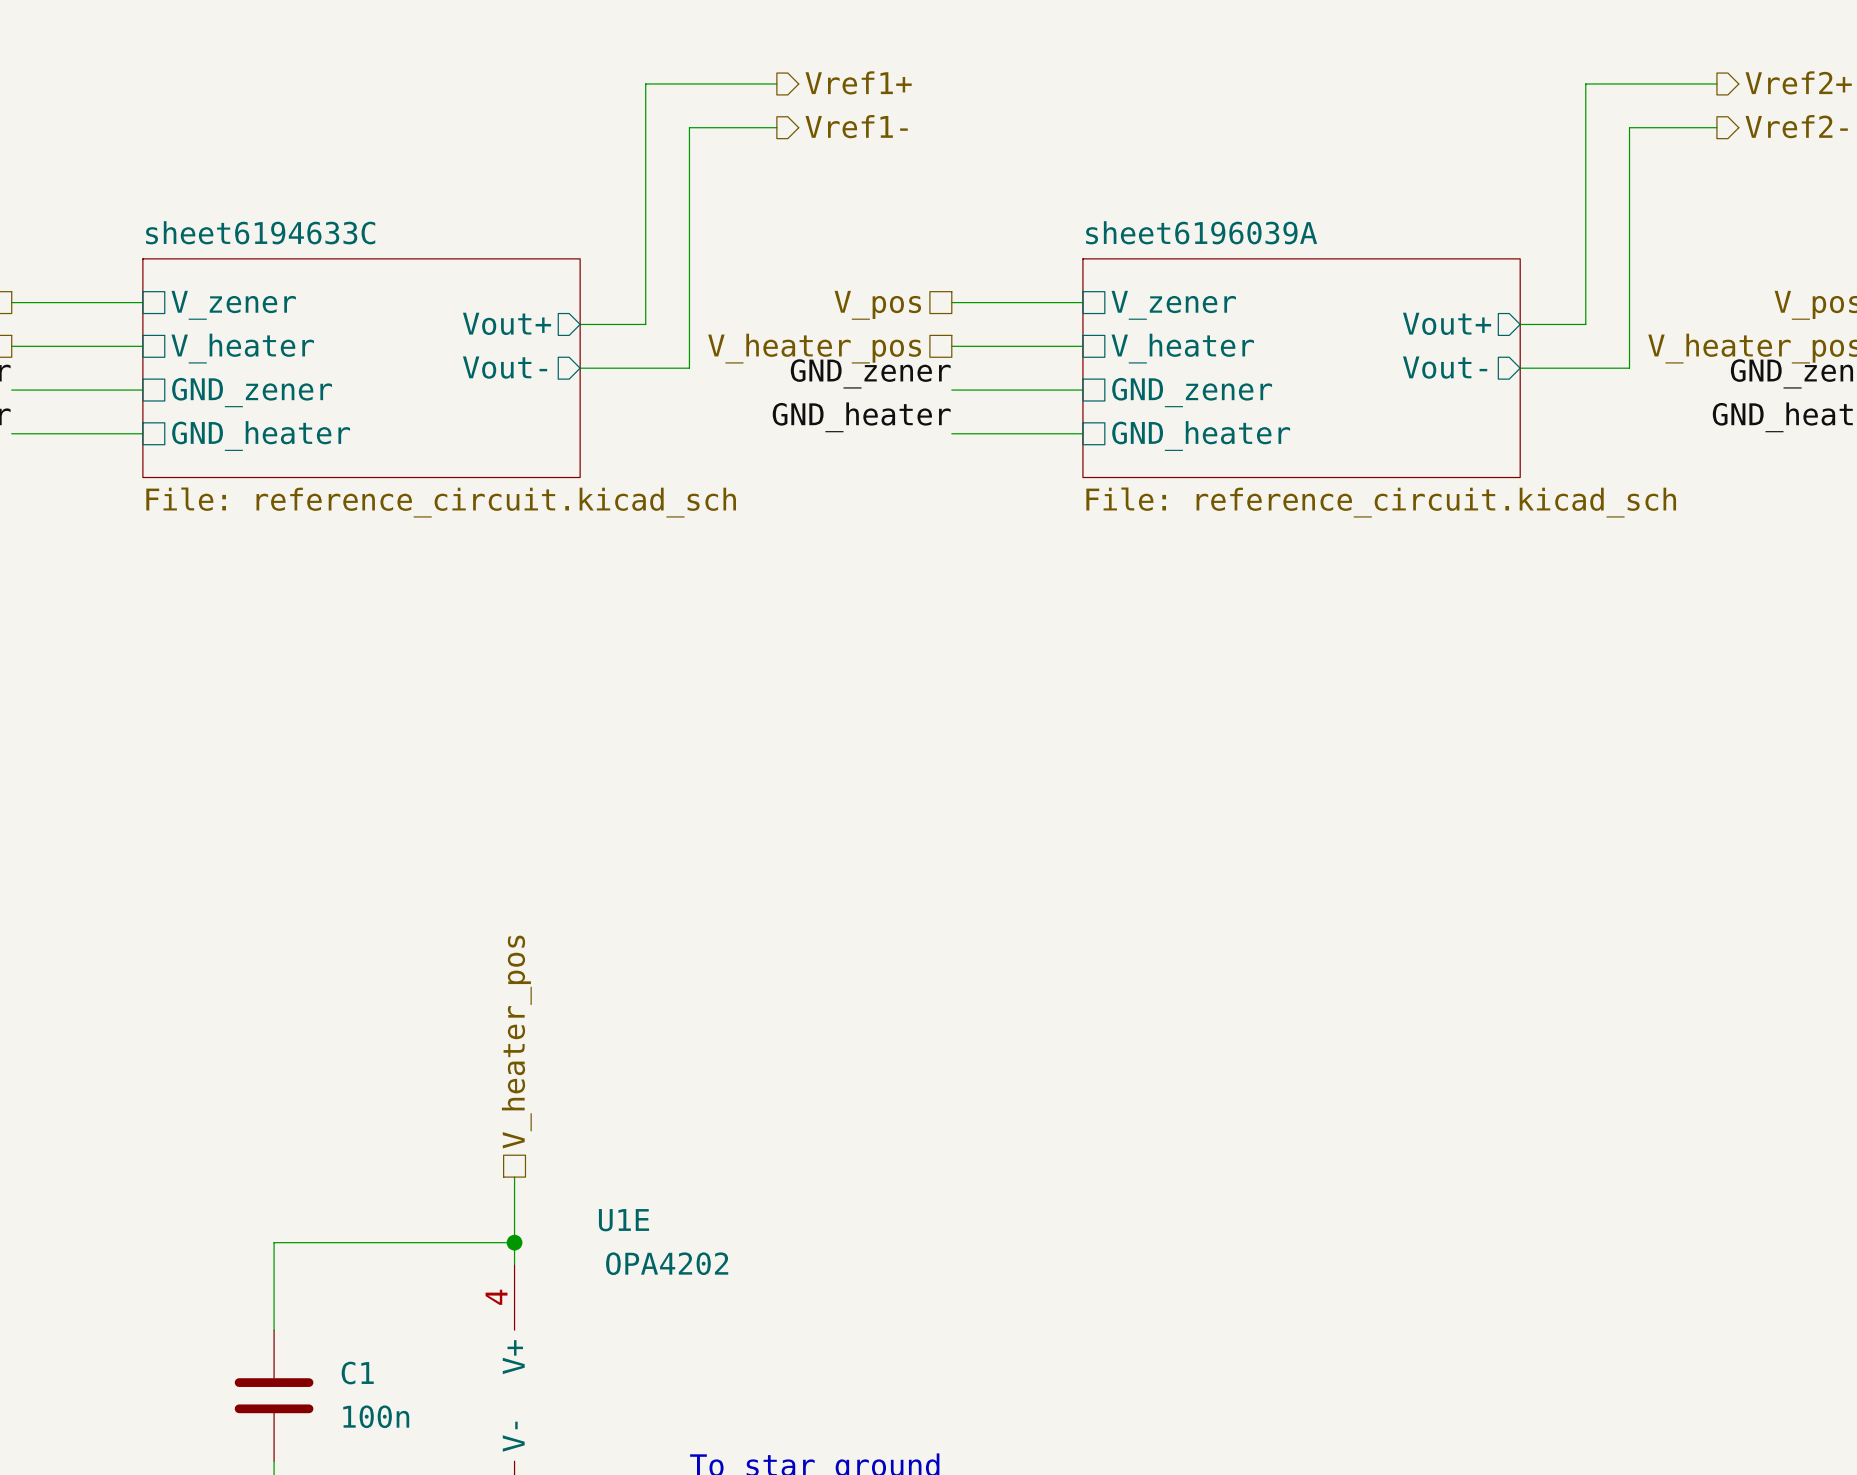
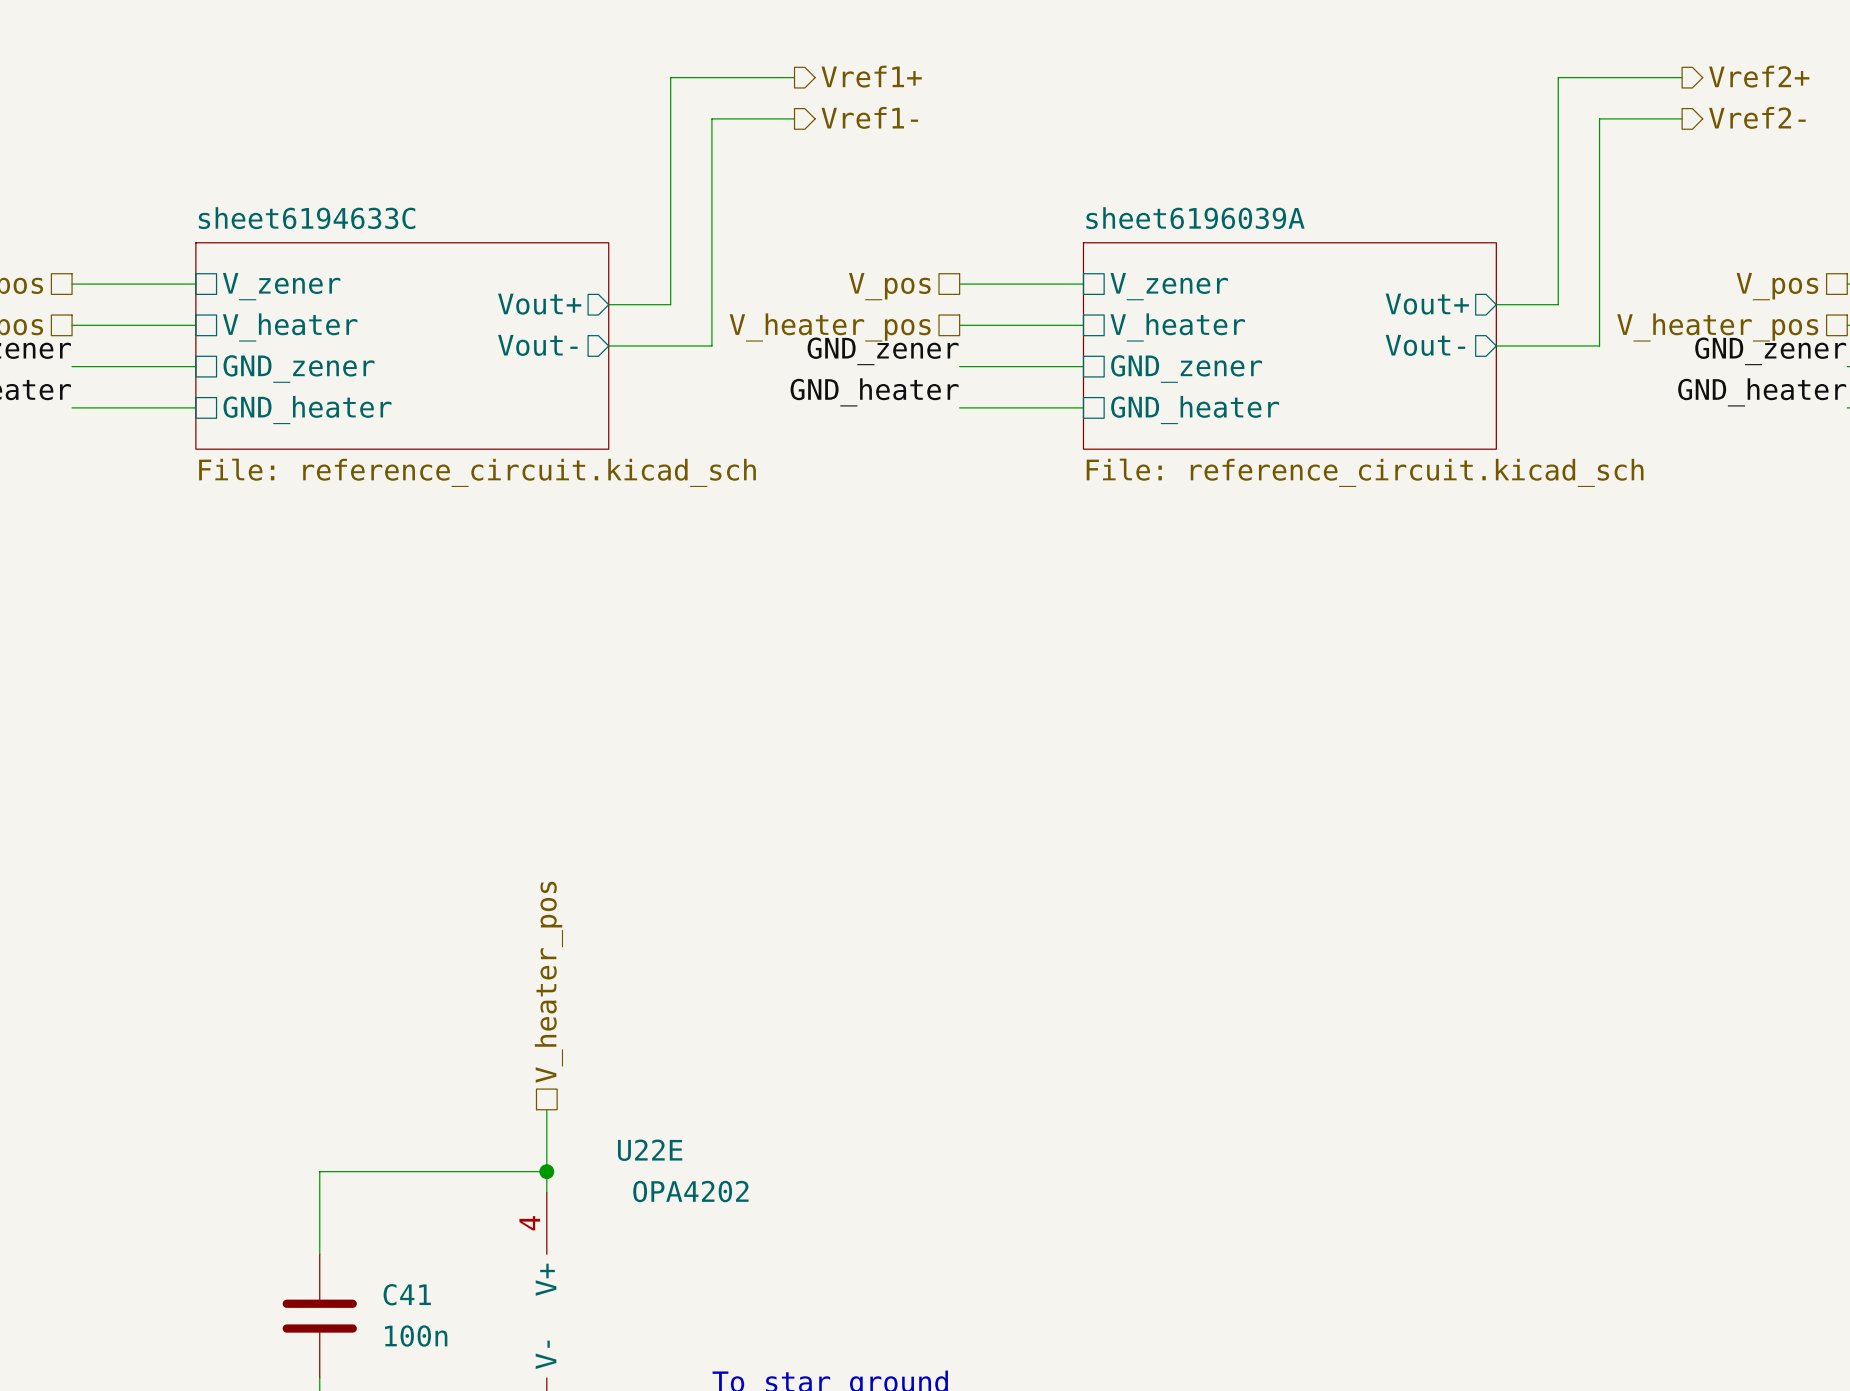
U1E name: U1E (623, 1220) -> U22E (650, 1150)
C1 name: C1 (357, 1373) -> C41 (407, 1294)

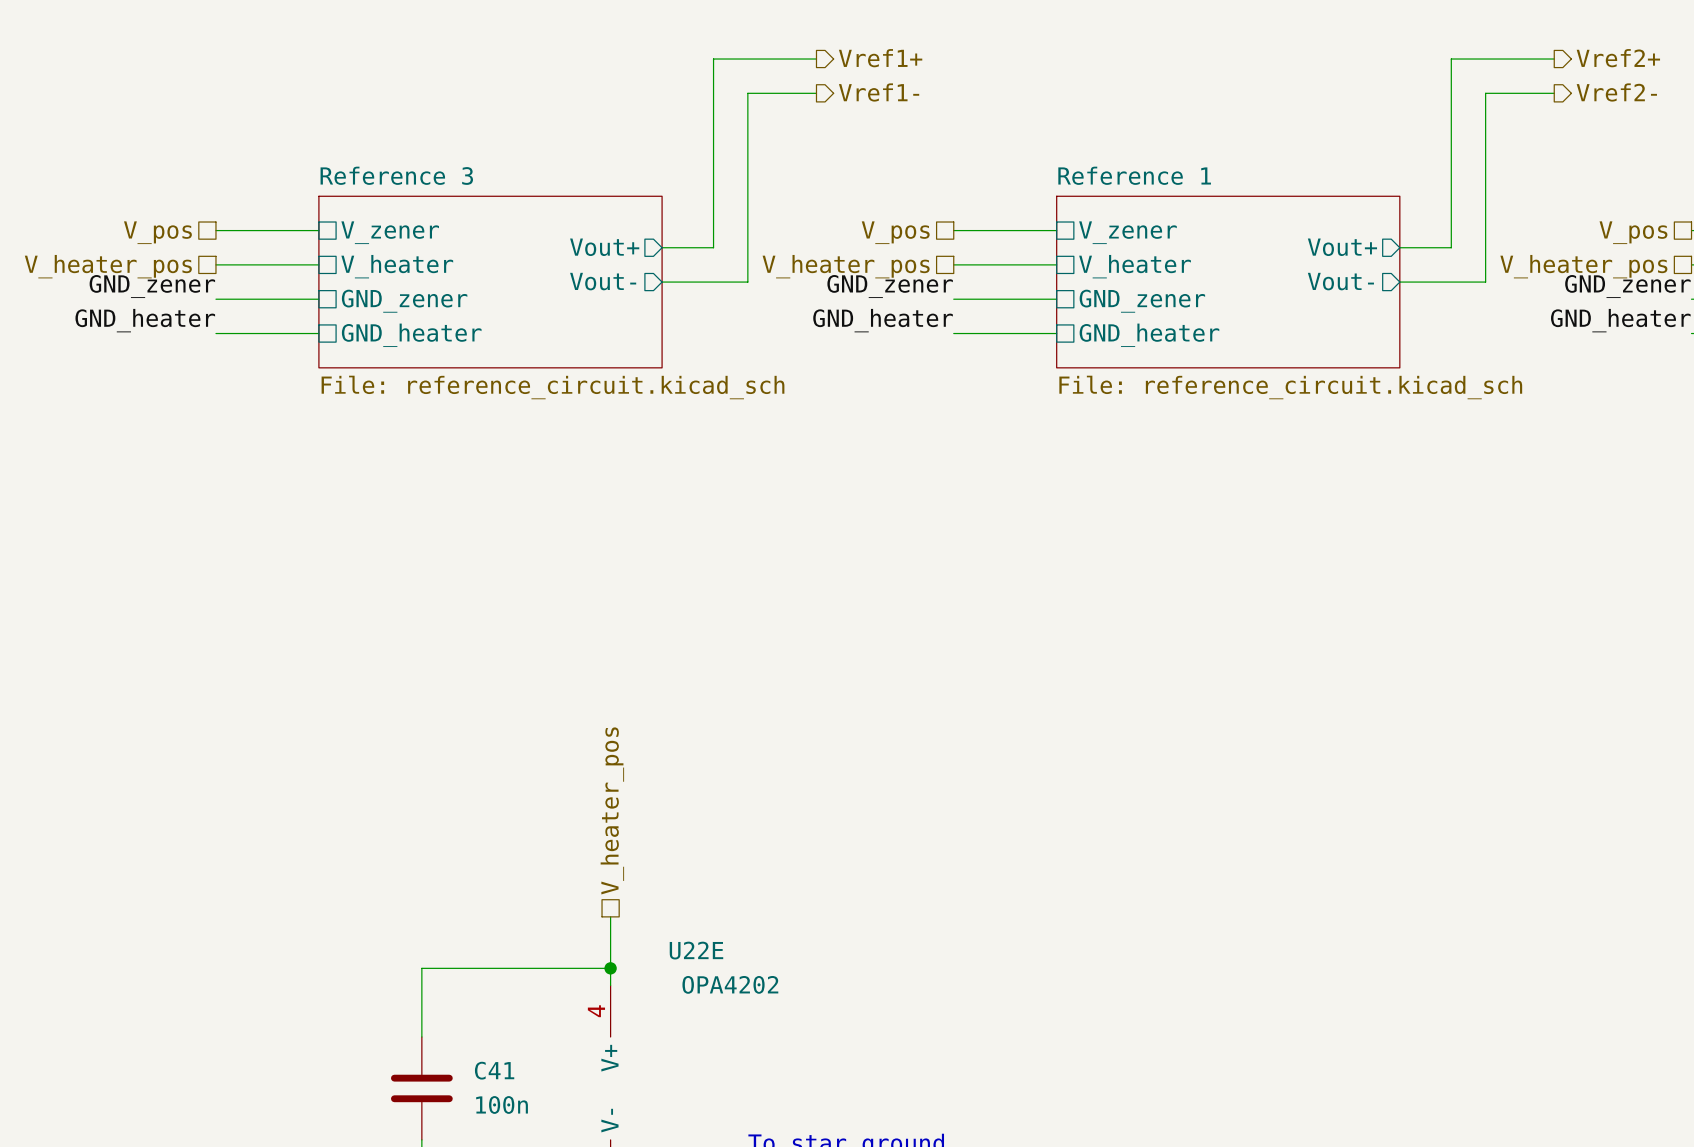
sheet sheet6194633C name: sheet6194633C (307, 218) -> Reference 3 (396, 175)
sheet sheet6196039A name: sheet6196039A (1195, 218) -> Reference 1 (1134, 175)

